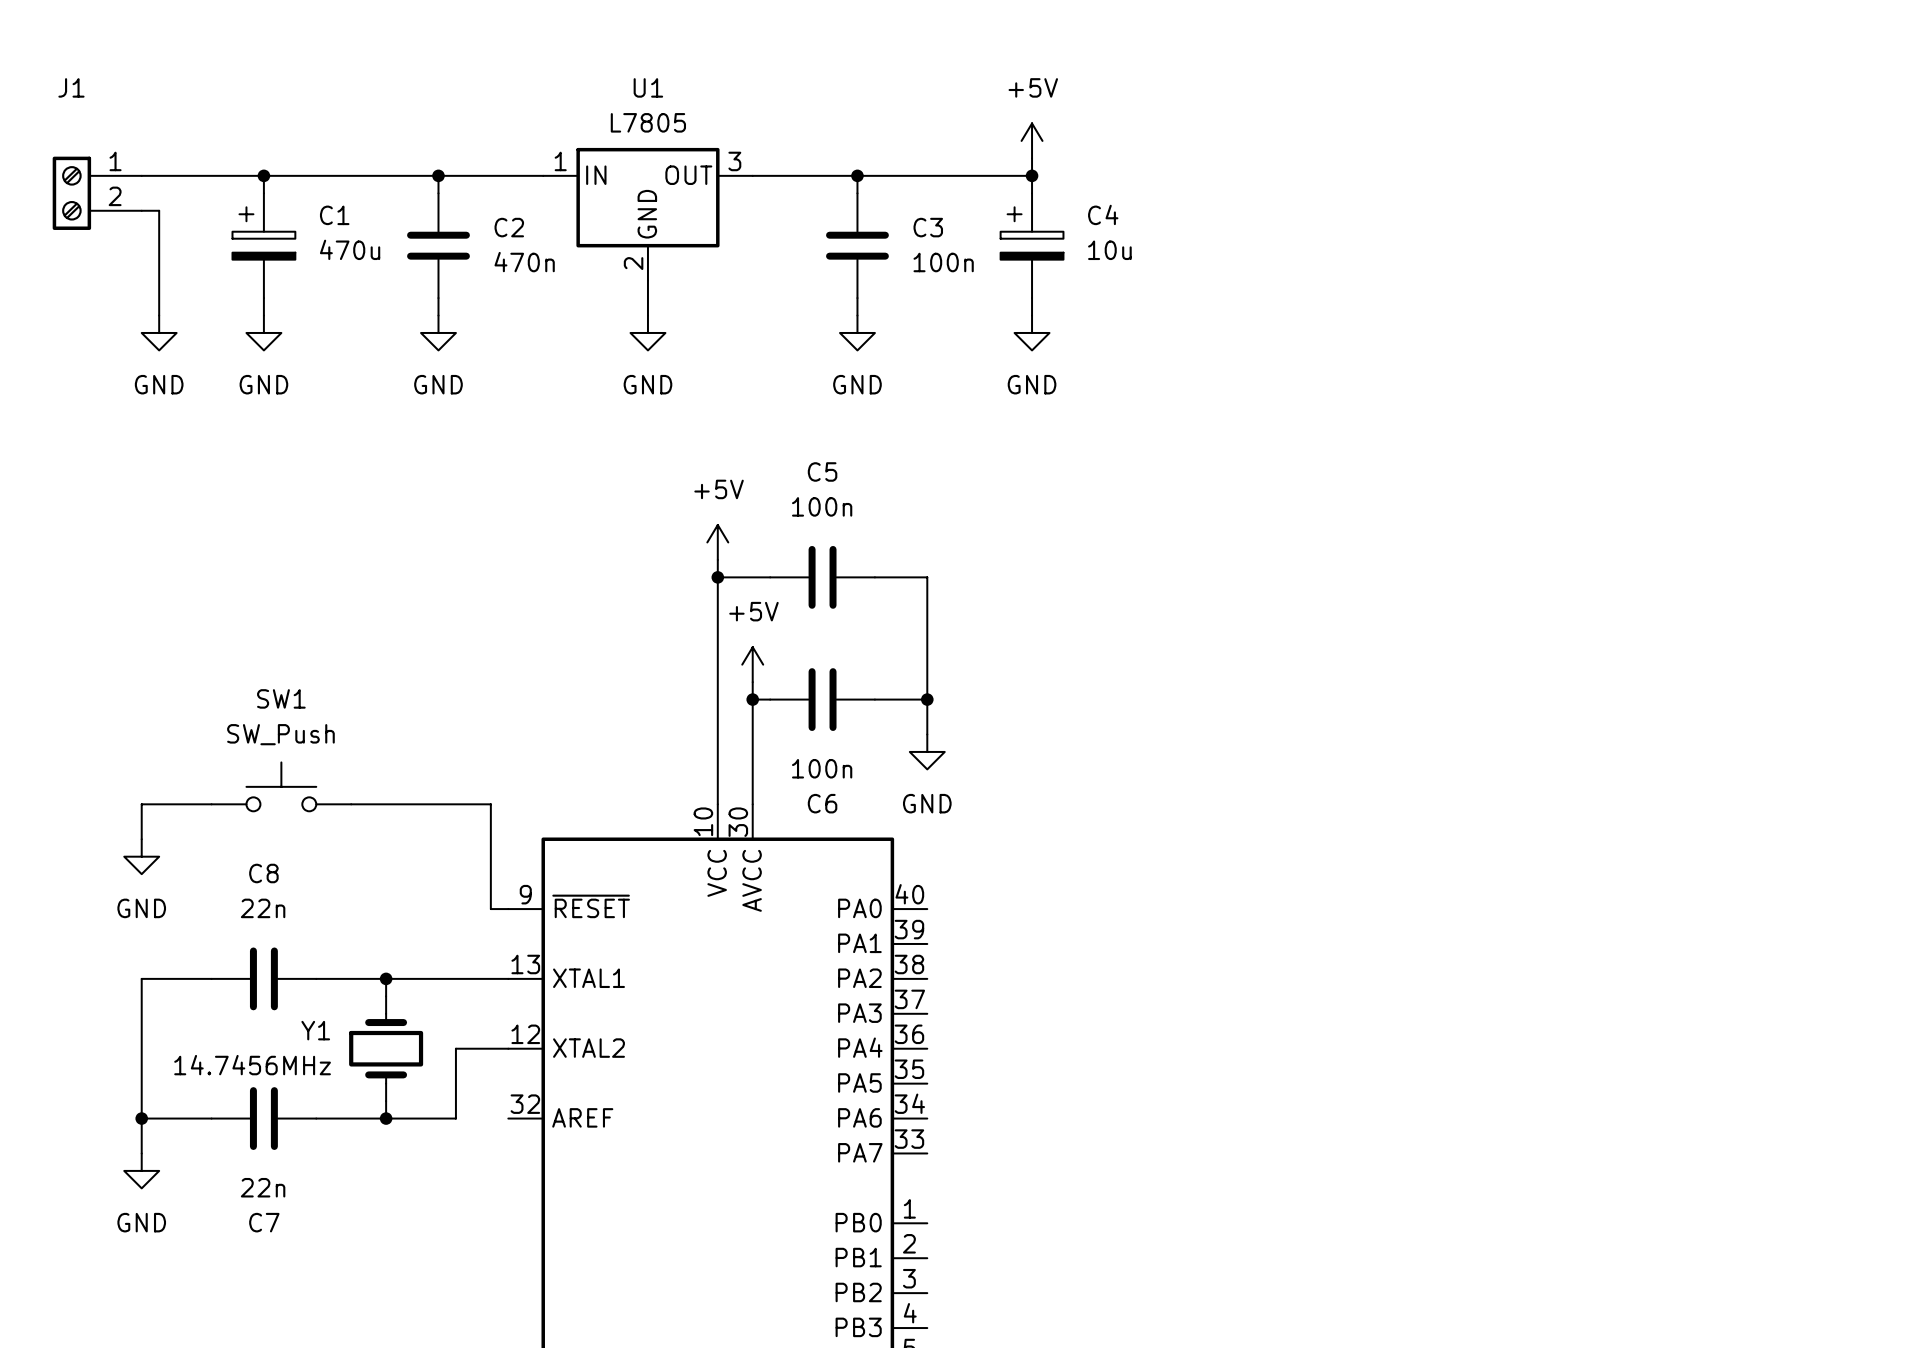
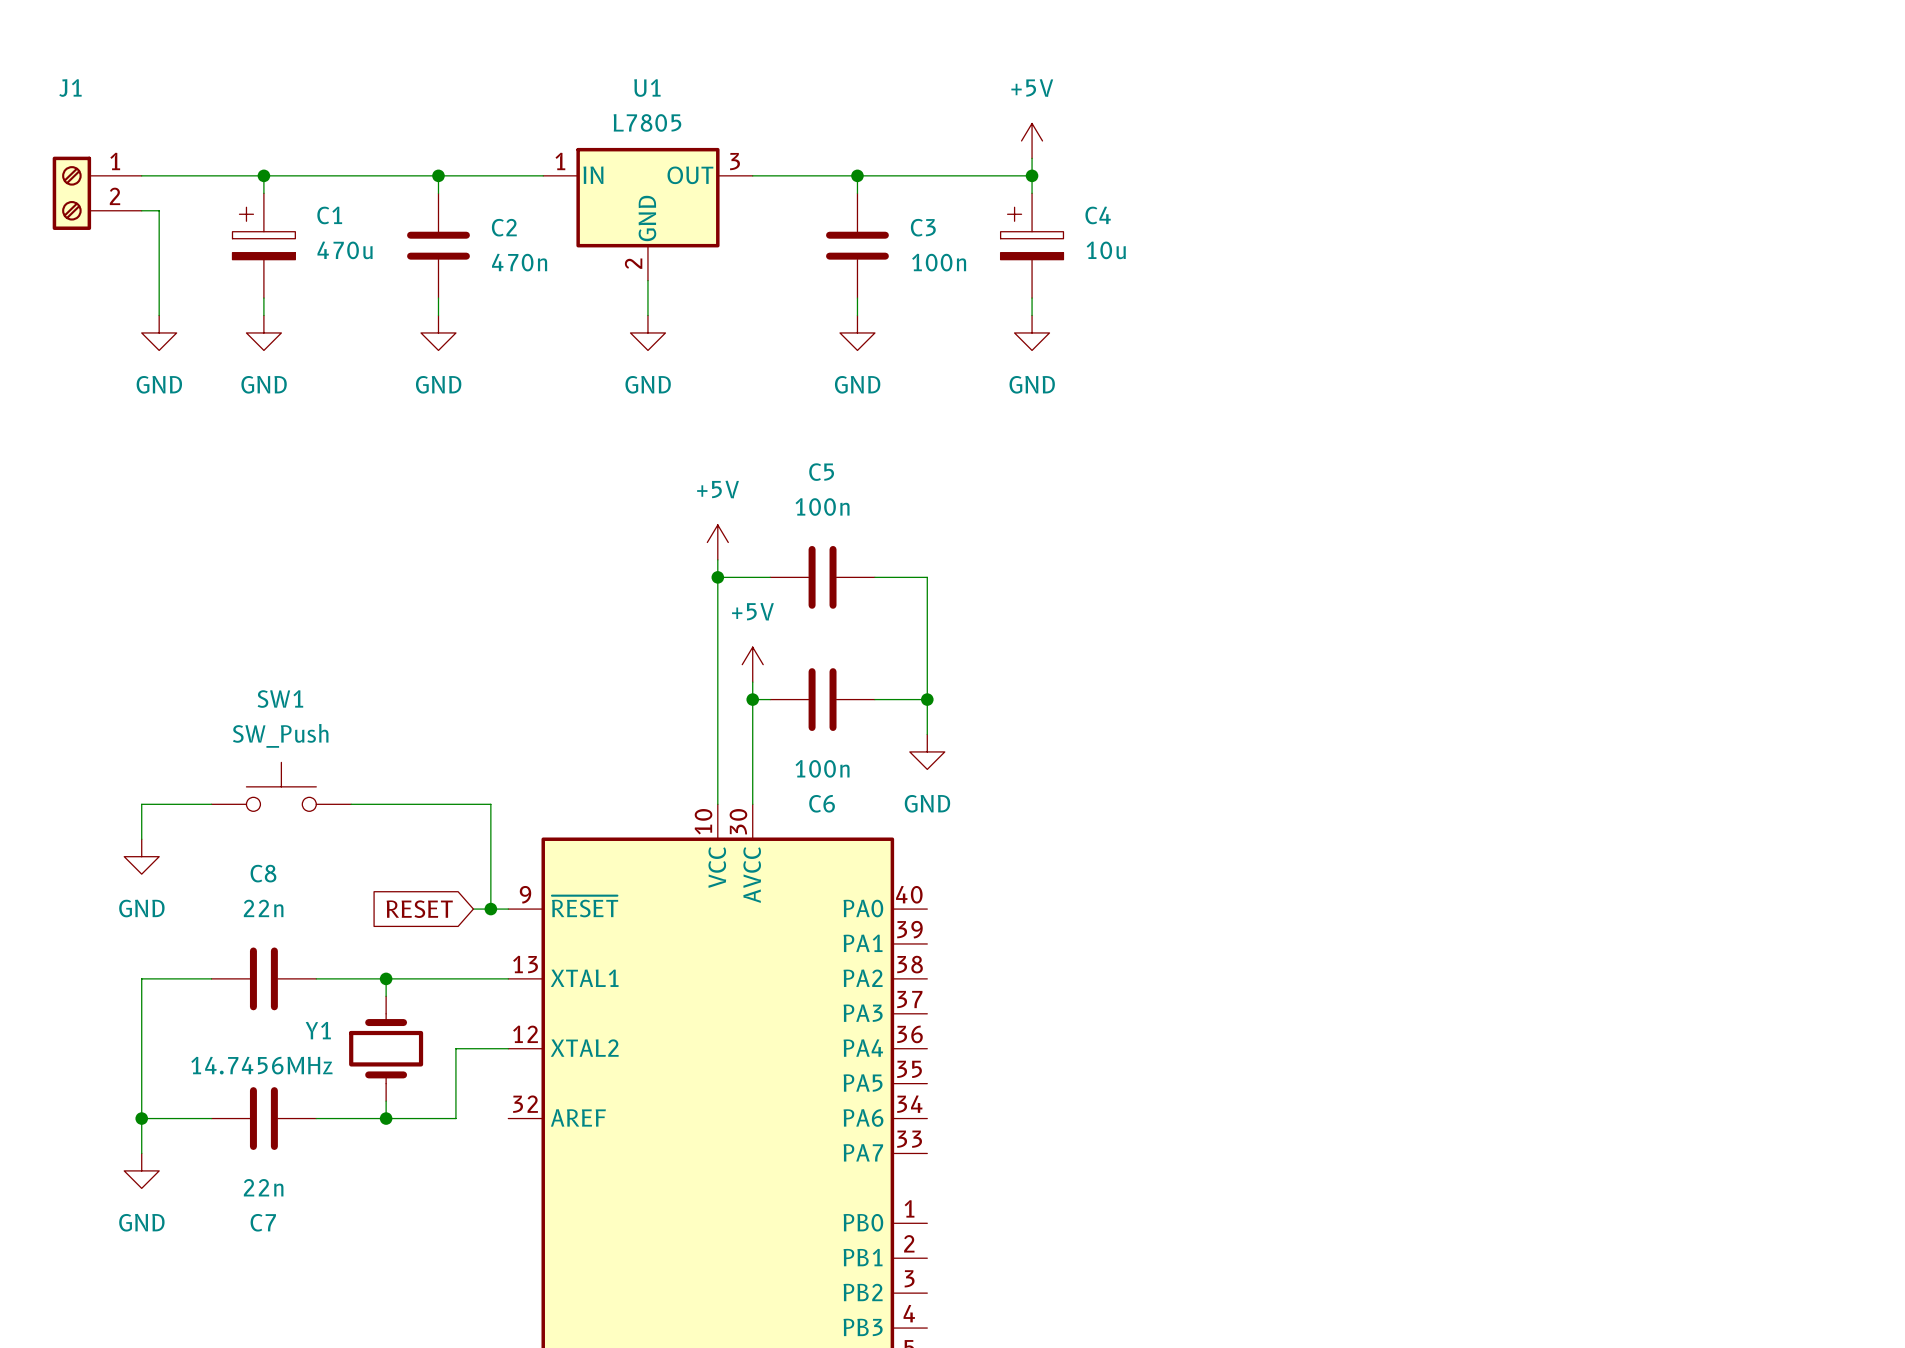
global label: none -> RESET (419, 909)
wire: none -> (473, 909) (490, 909)
junction: none -> (490, 909)

